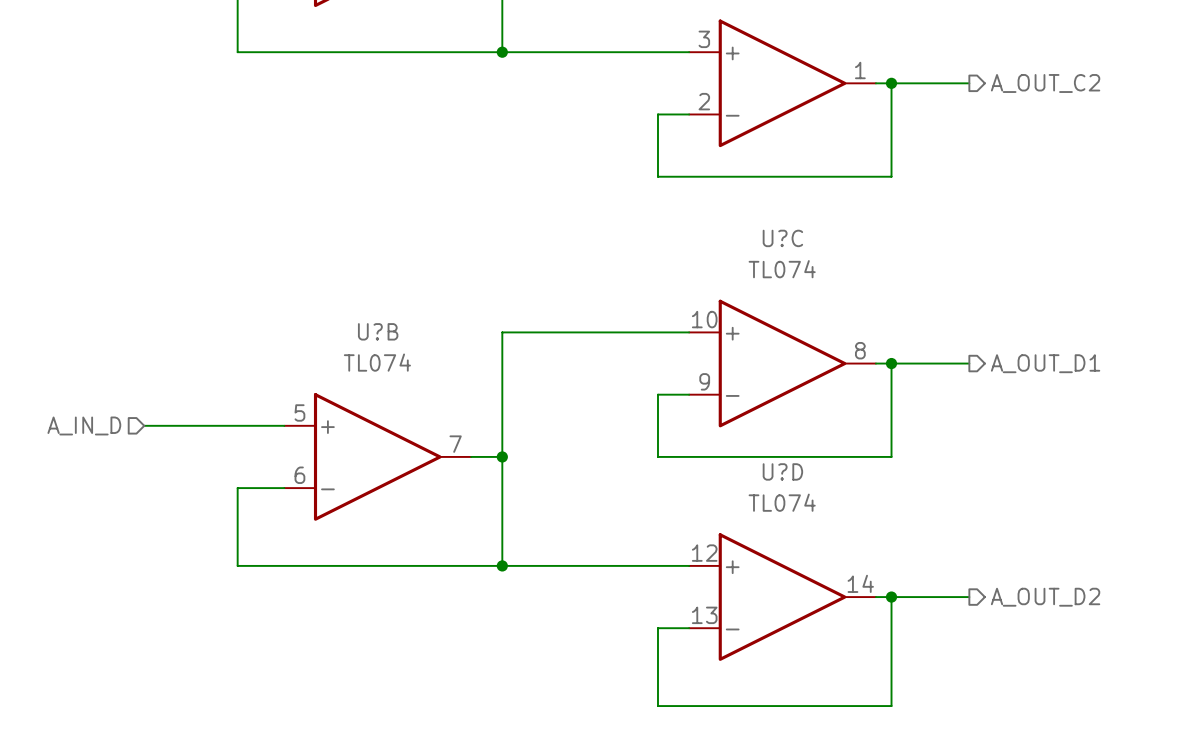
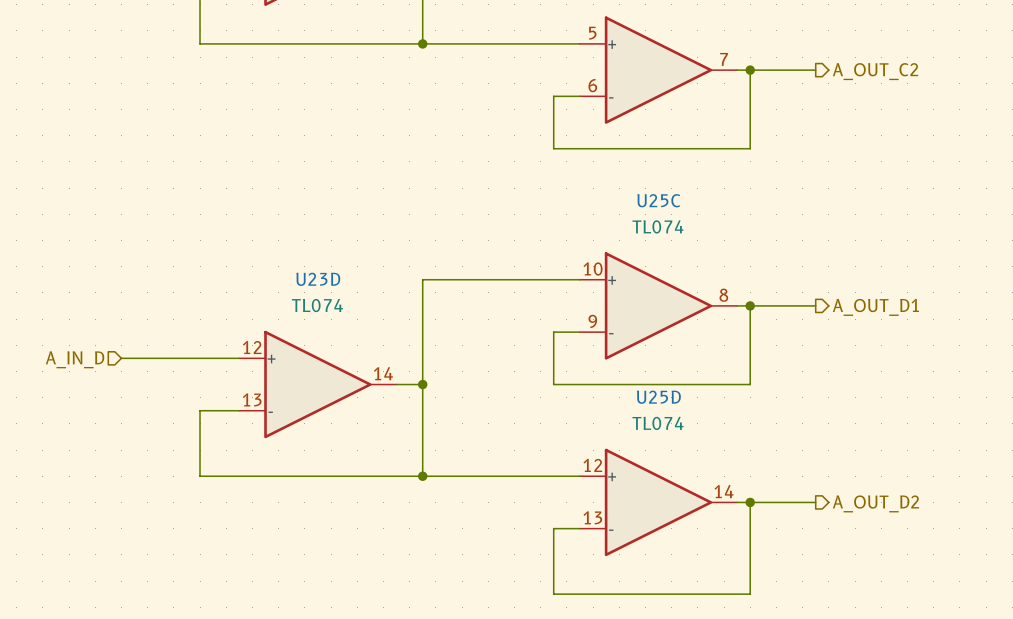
part pin number: 3 (704, 39) -> 5 (592, 33)
part pin number: 1 (860, 70) -> 7 (724, 59)
part pin number: 2 (704, 101) -> 6 (592, 85)
U?C name: U?C (782, 238) -> U25C (658, 200)
U?B name: U?B (378, 331) -> U23D (318, 279)
U?B pin number: 5 (299, 412) -> 12 (252, 347)
U?B pin number: 7 (455, 444) -> 14 (383, 373)
U?D name: U?D (782, 471) -> U25D (658, 397)
U?B pin number: 6 (299, 475) -> 13 (252, 399)

